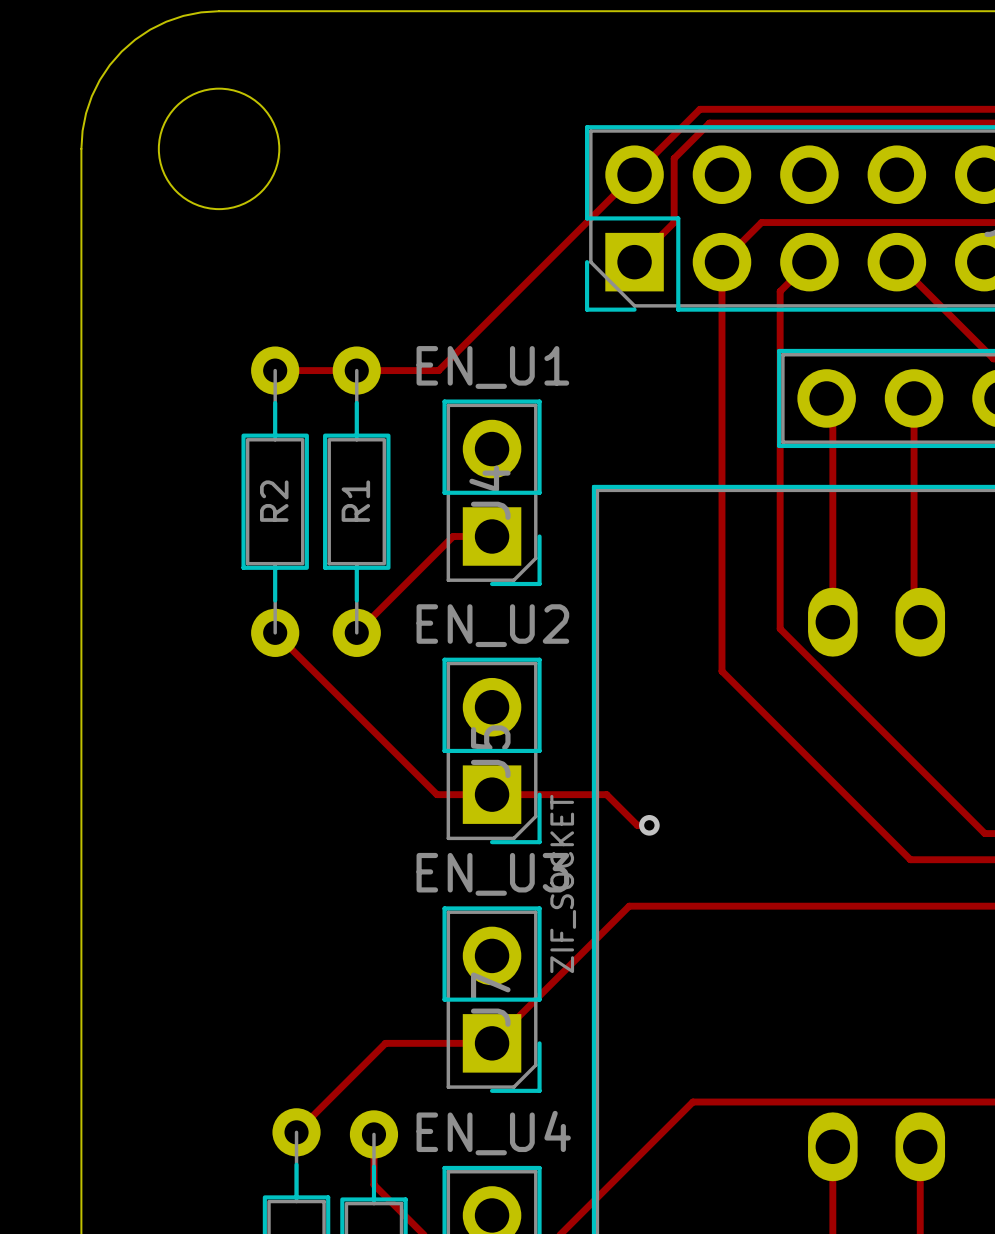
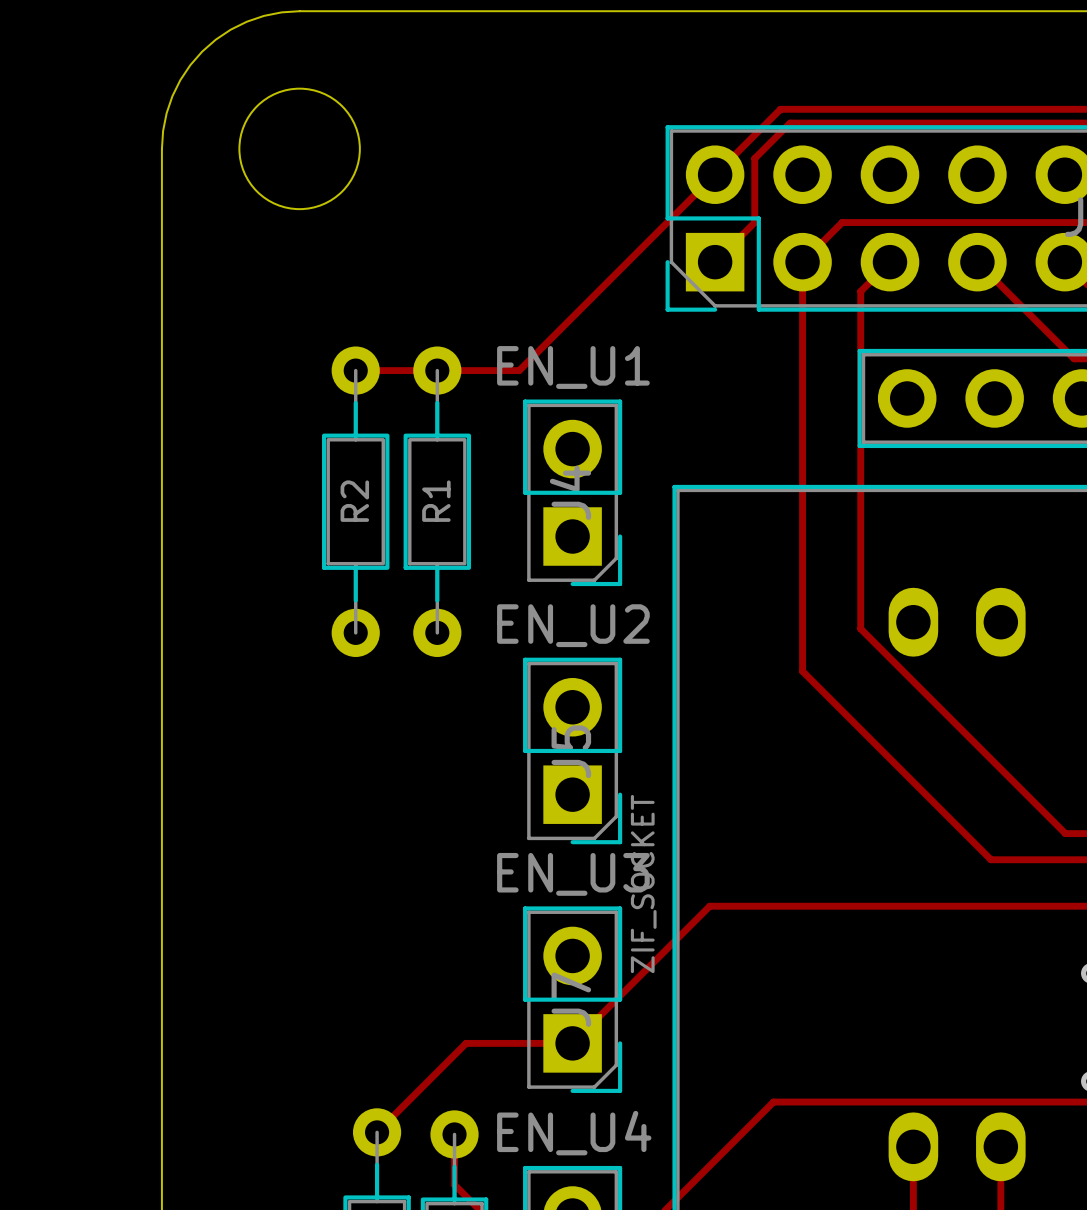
track: (826, 398) (832, 404) (832, 622) -> none
track: (914, 398) (914, 616) (920, 622) -> none
track: (492, 536) (453, 536) (356, 632) -> none
track: (275, 632) (436, 794) (606, 794) (637, 825) (649, 825) -> none
via: (649, 825) -> none

